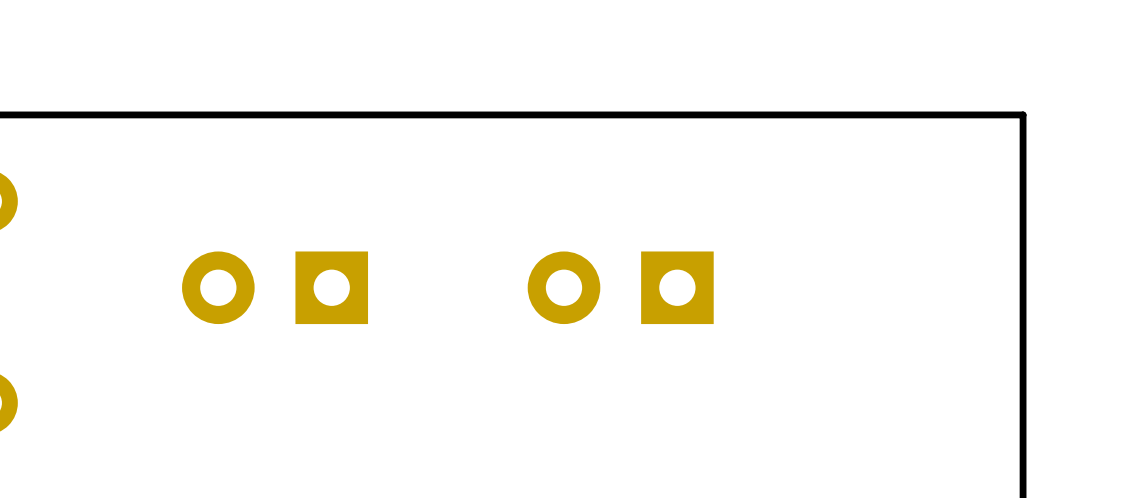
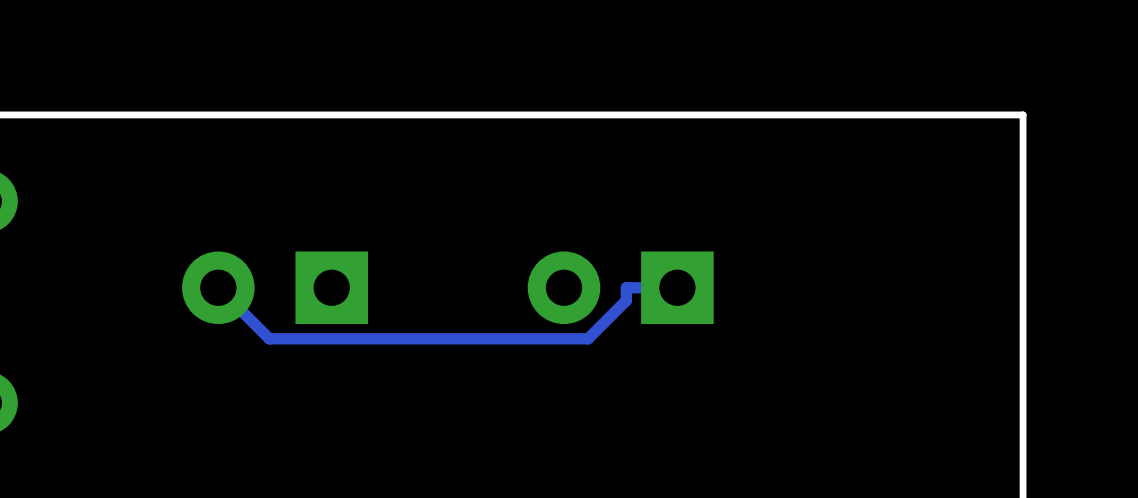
track: none -> (677, 287) (626, 287) (626, 300) (588, 338) (269, 338) (218, 287)

